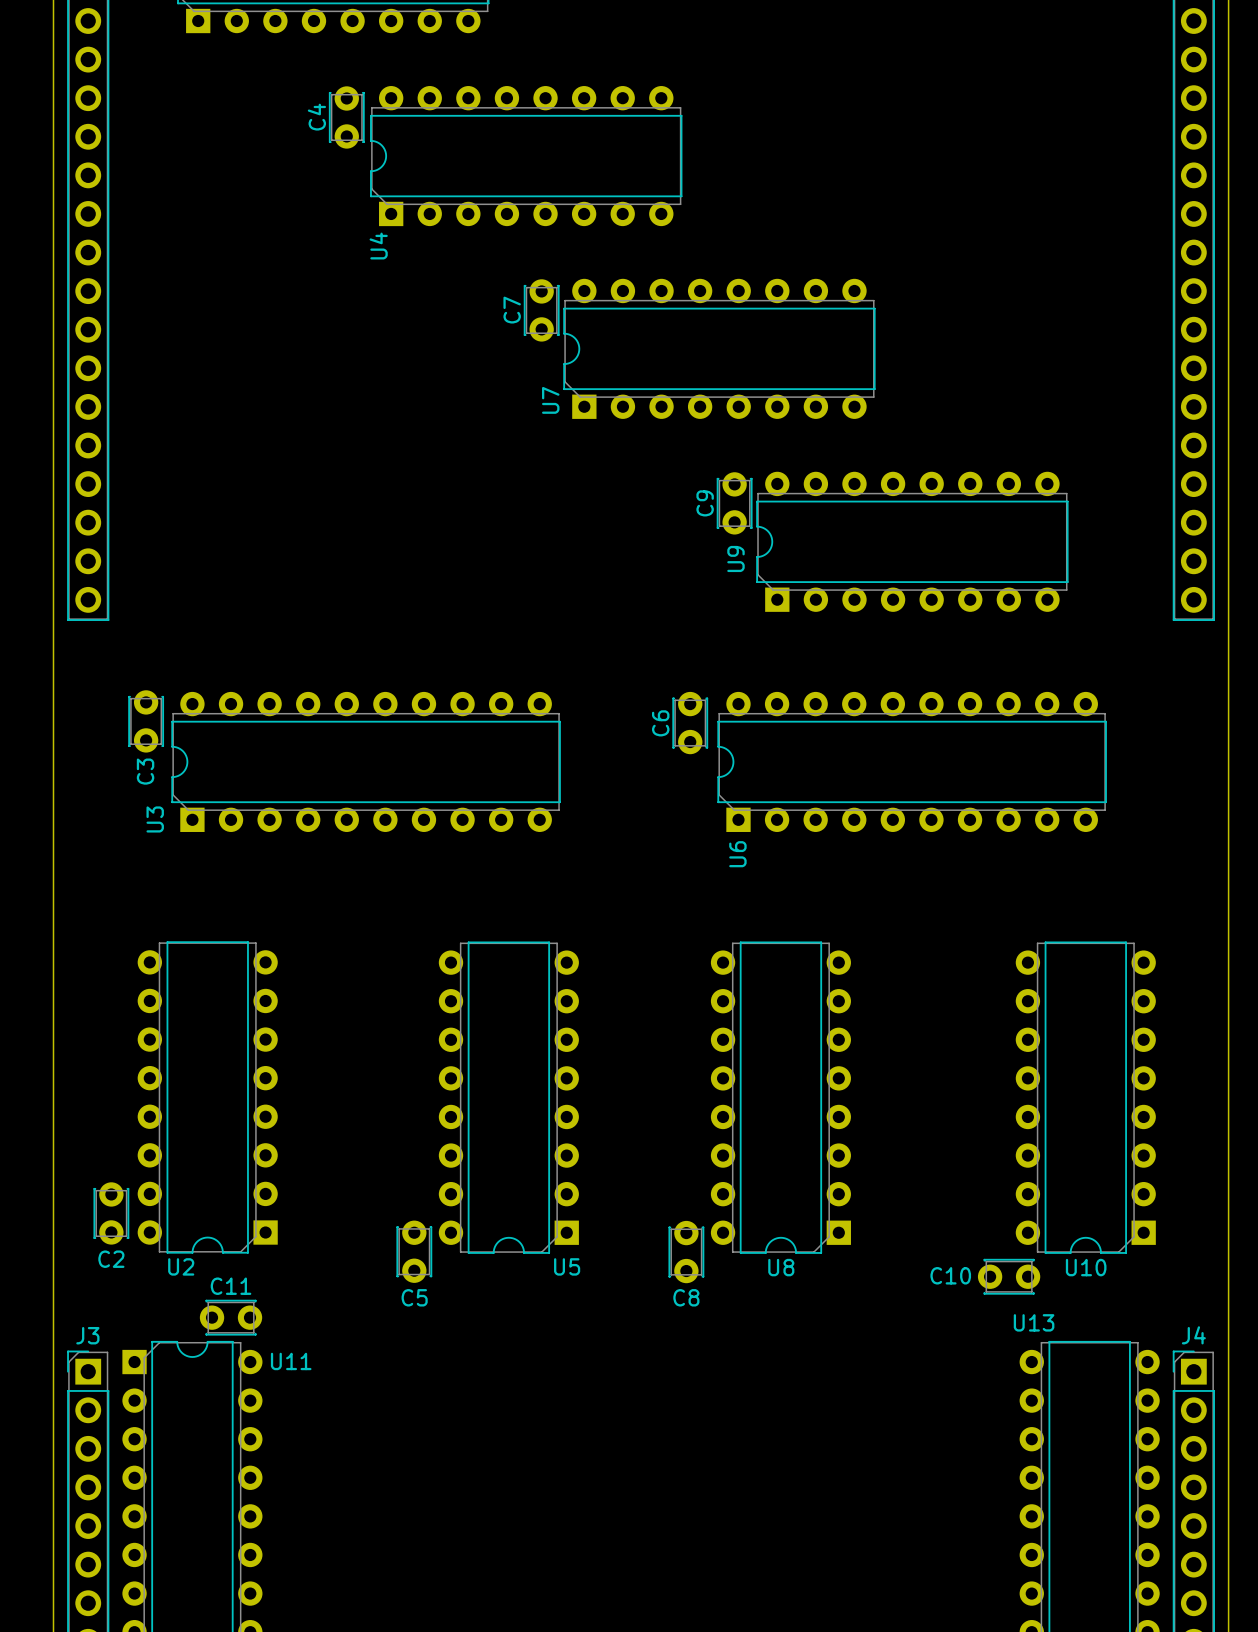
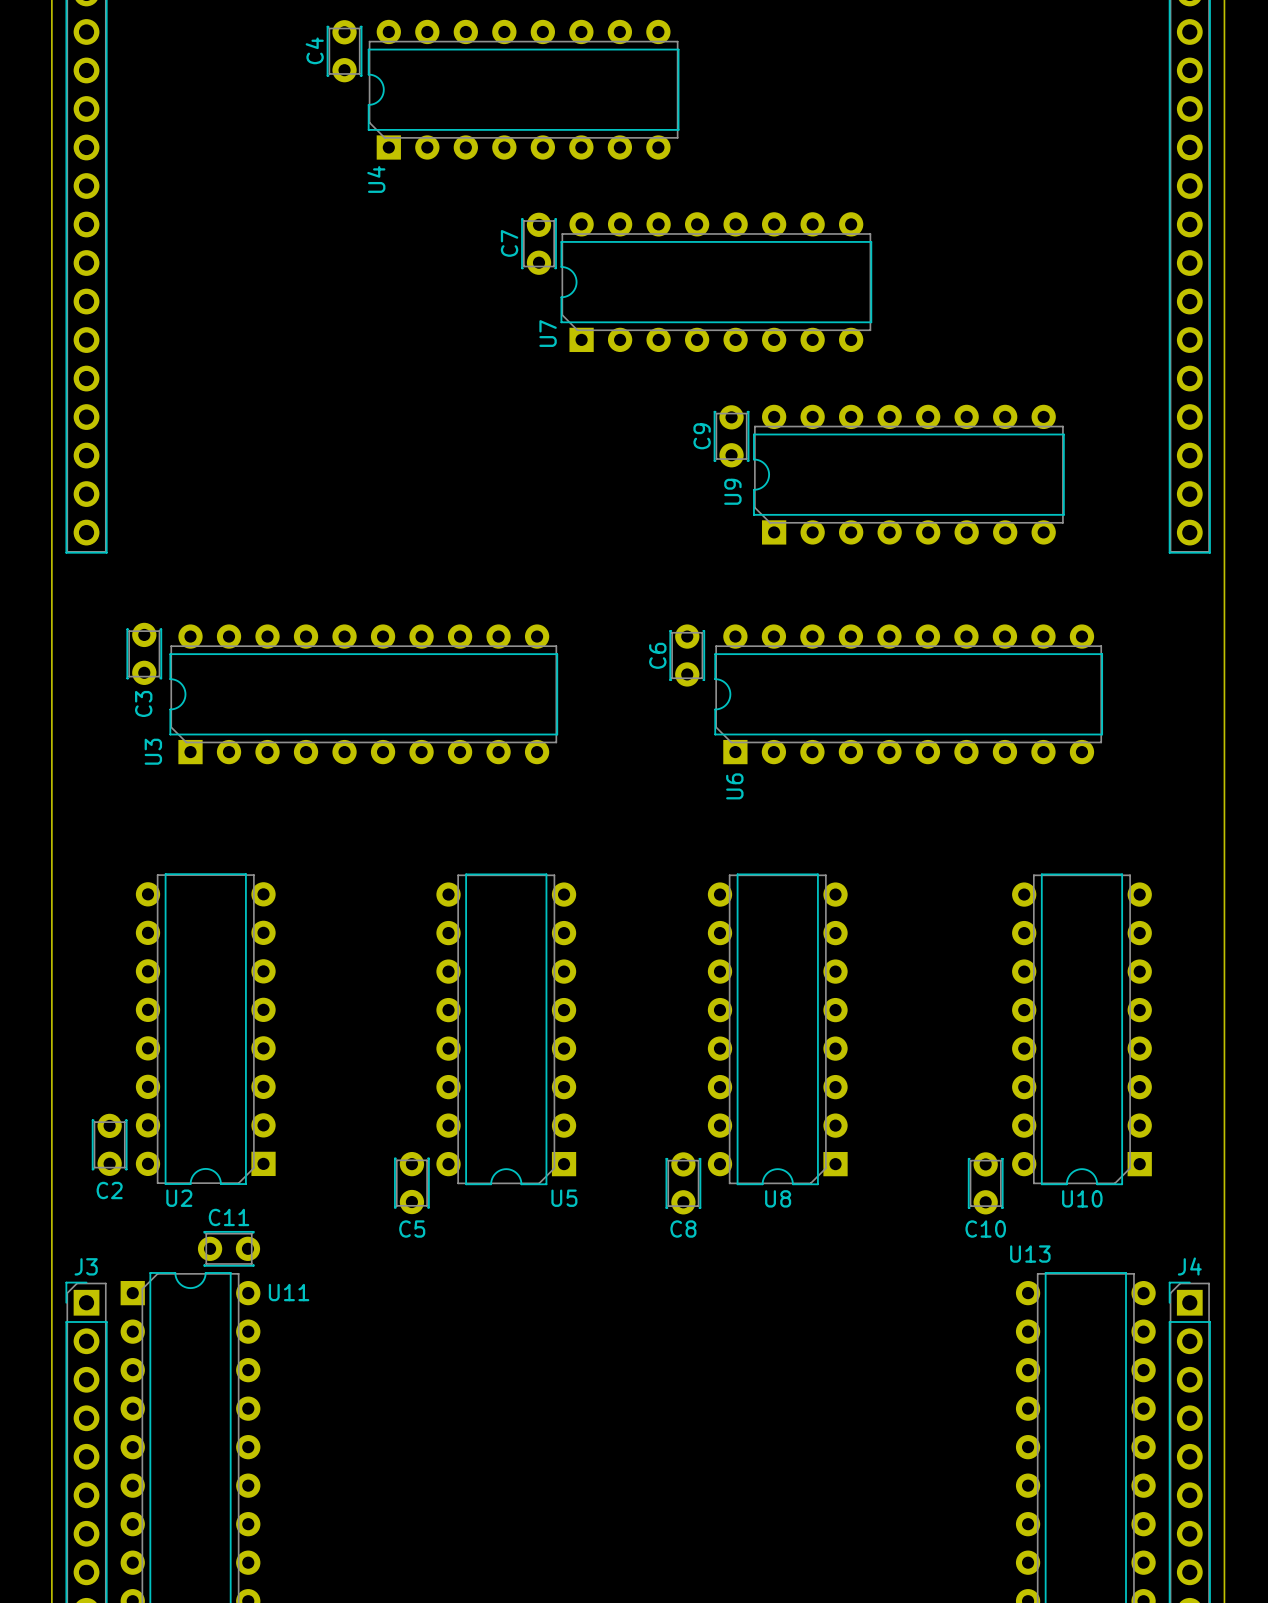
C10 name position: C10 (950, 1275) -> C10 (985, 1229)
C10 rotation: 0° (1009, 1276) -> 90° clockwise (985, 1183)

